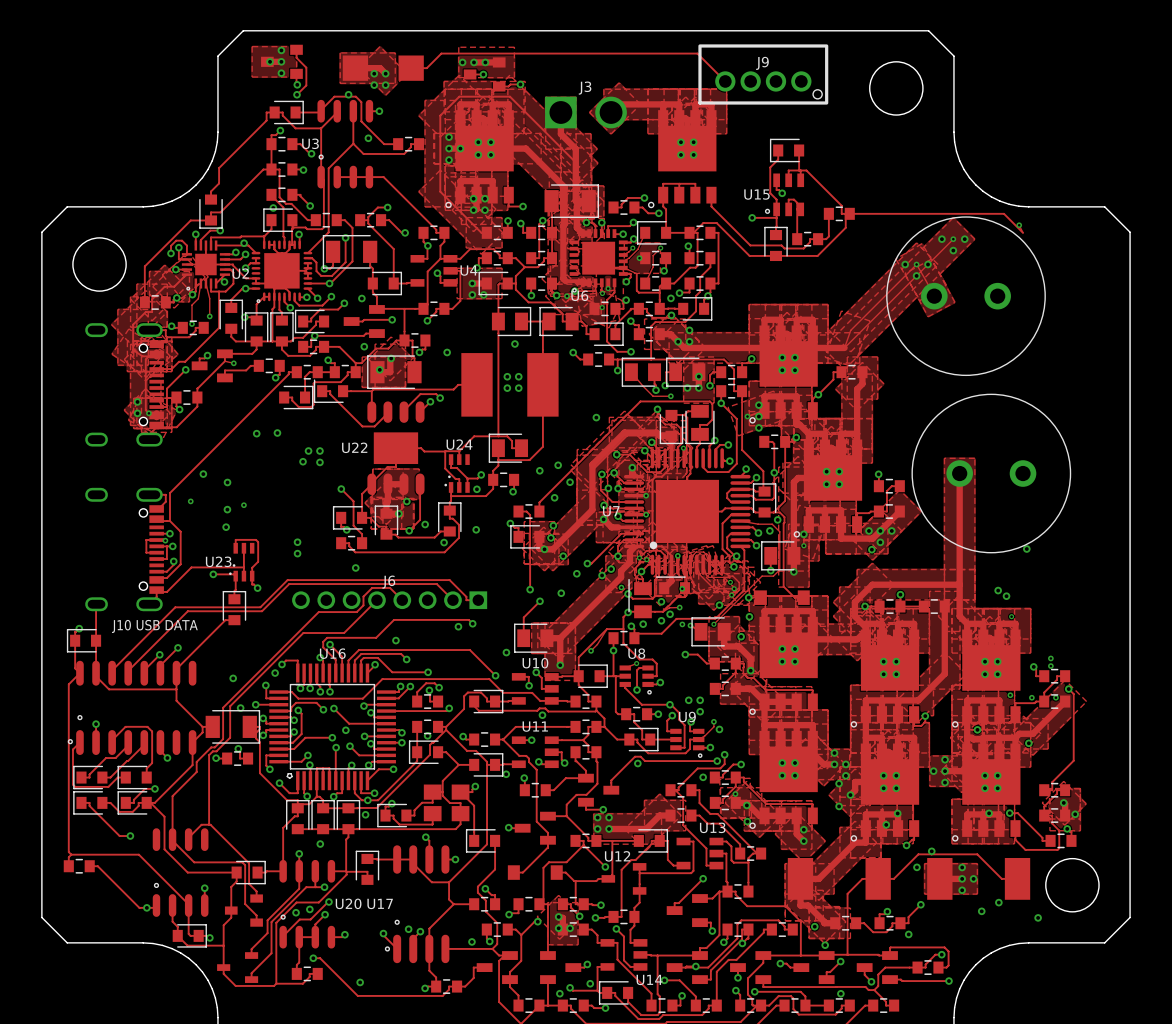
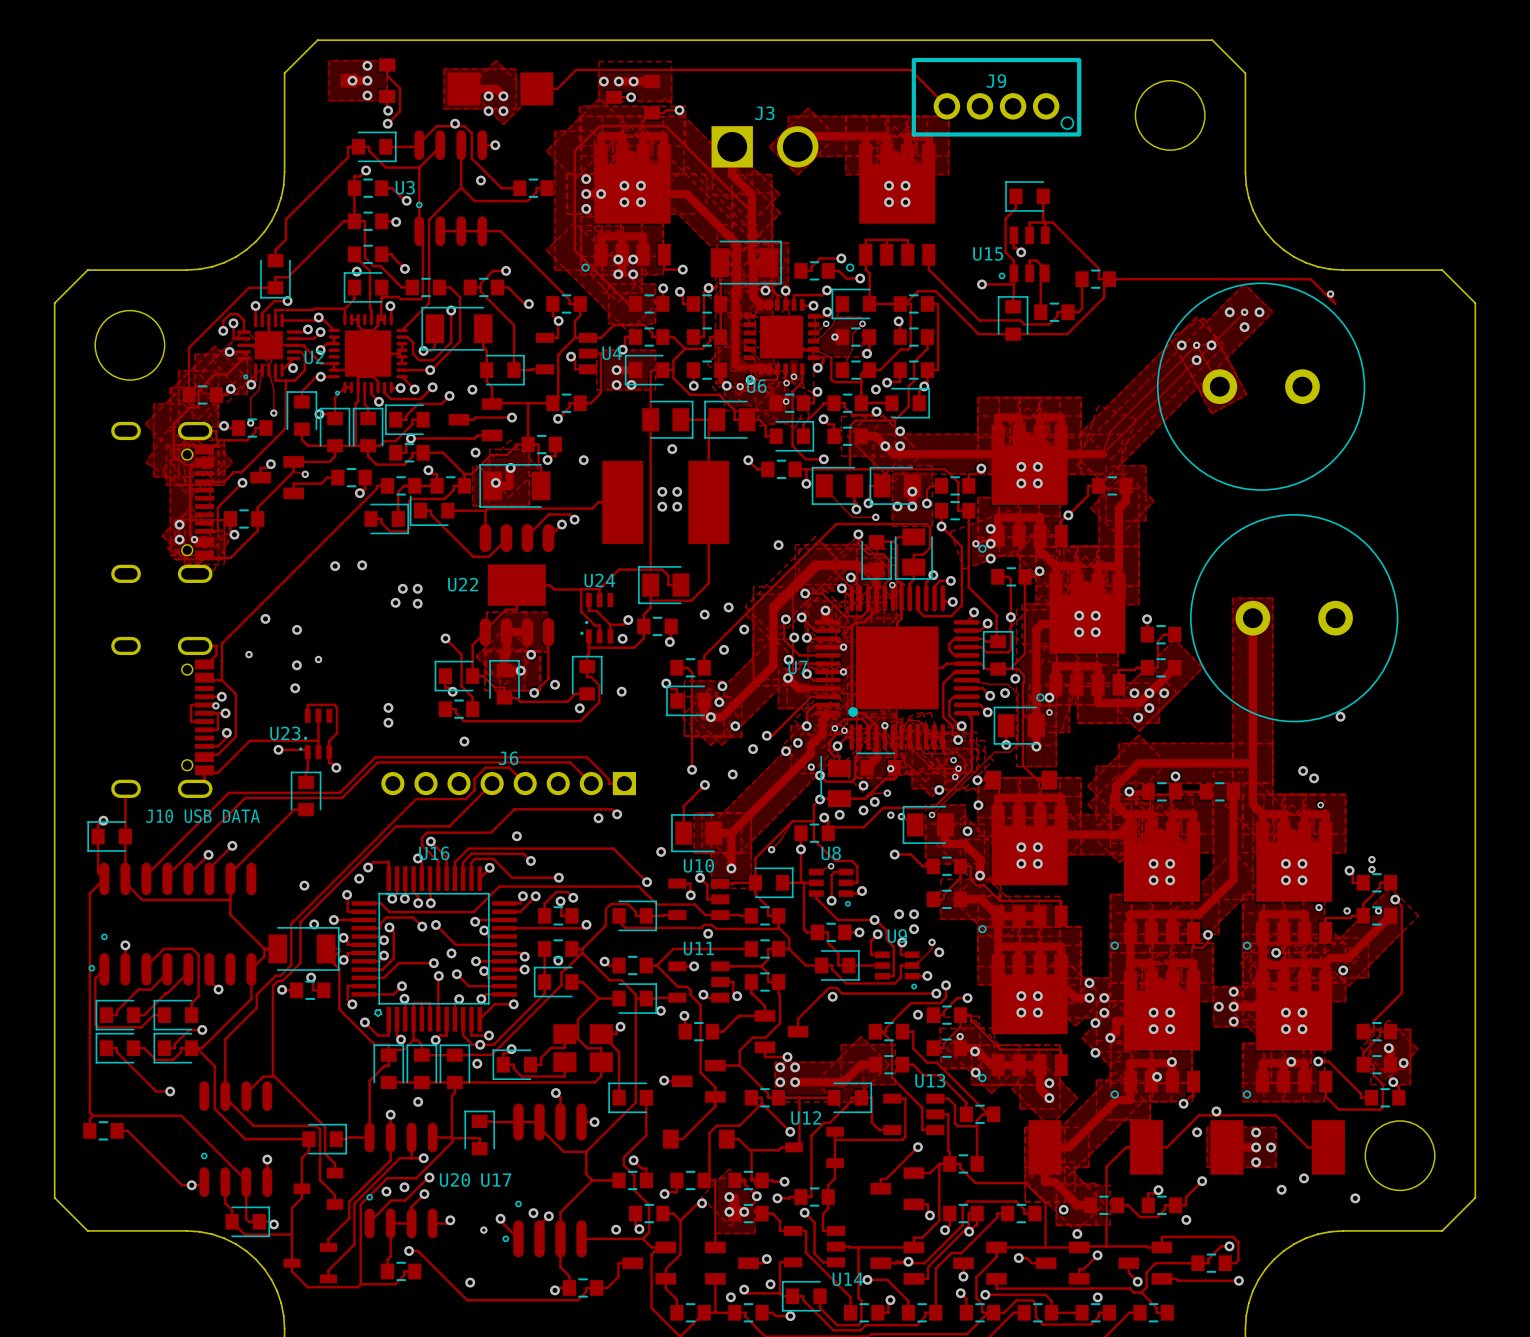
via: none -> (483, 1230)

